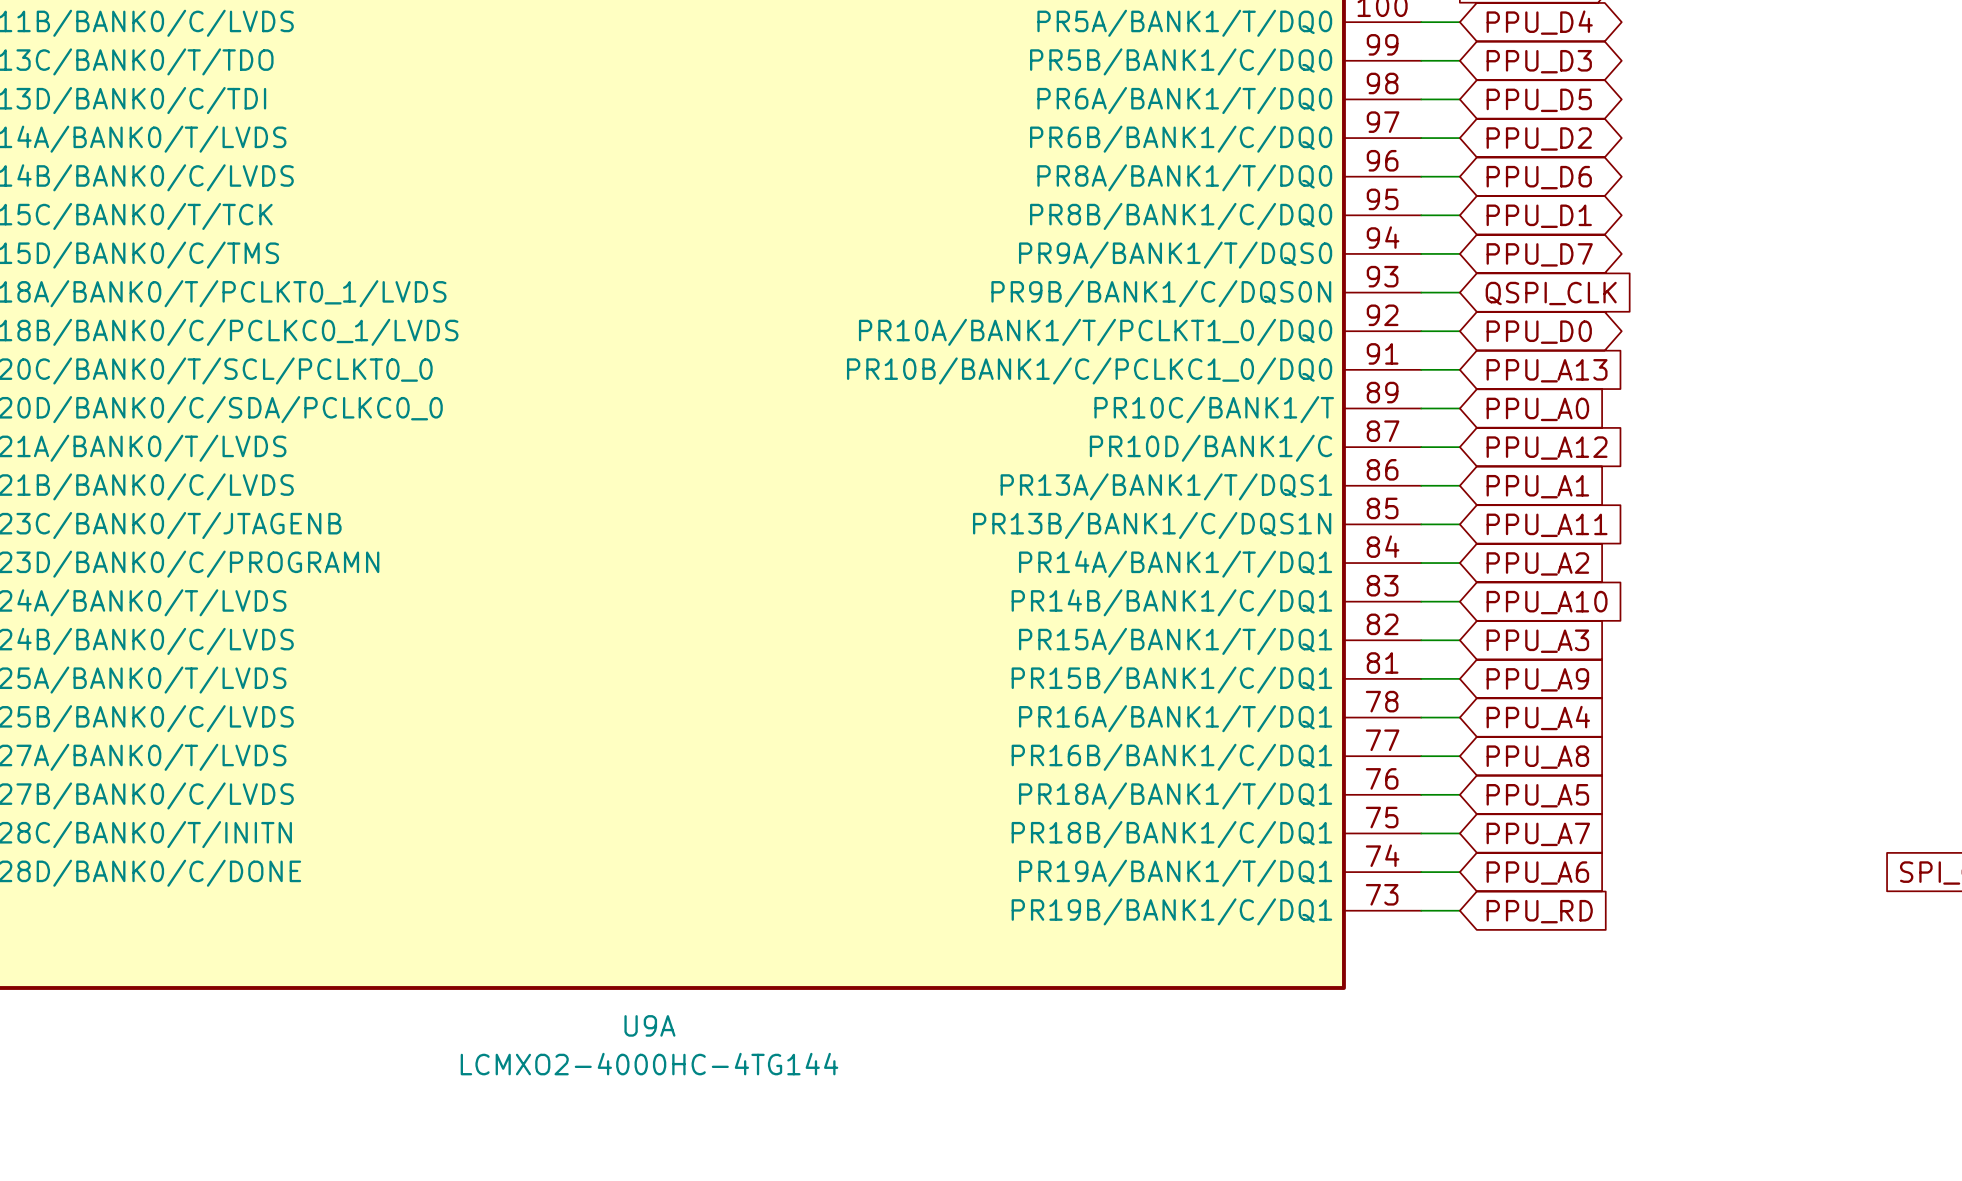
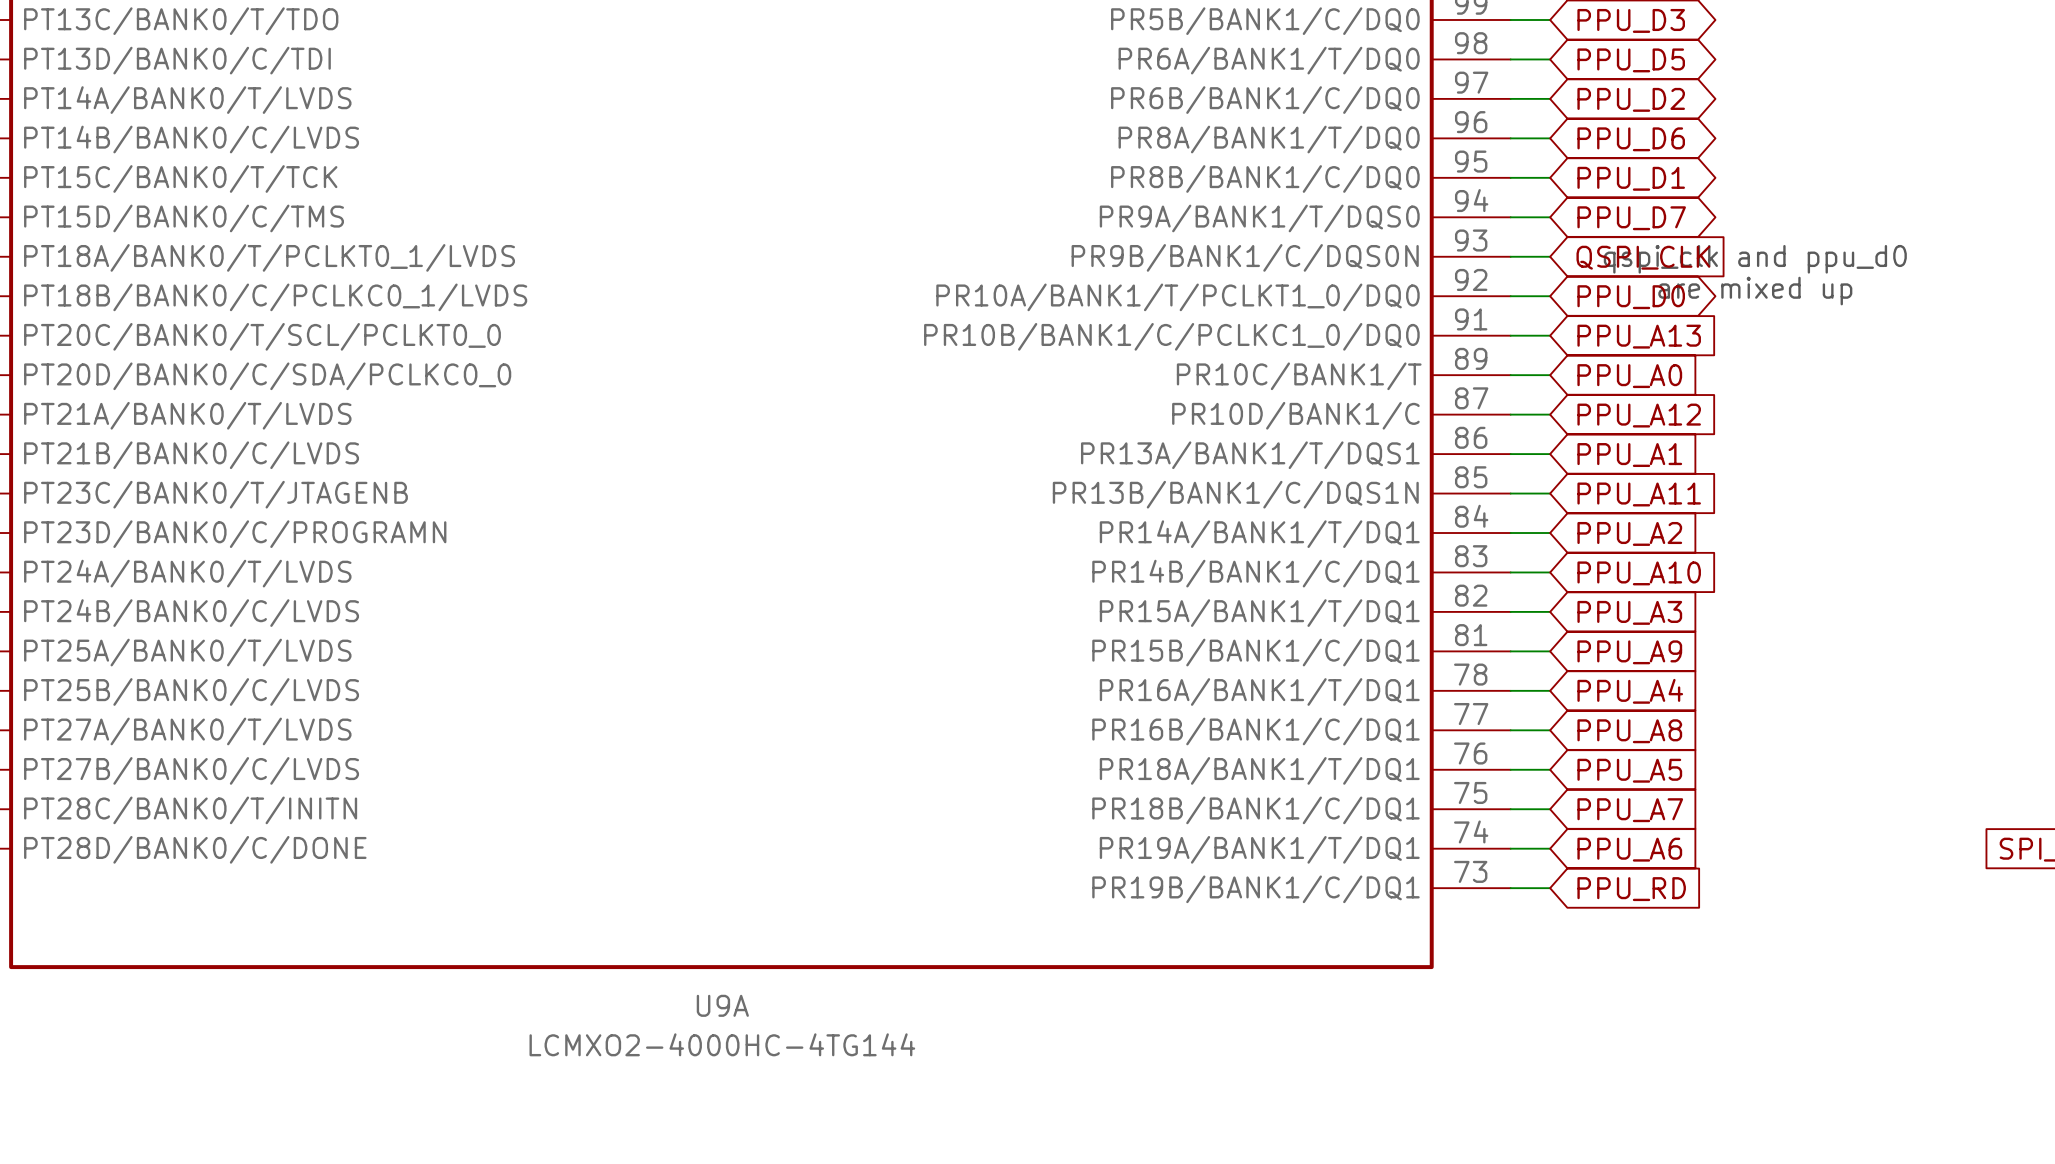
text: none -> qspi_clk and ppu_d0 (1755, 259)
text: none -> are mixed up (1755, 291)

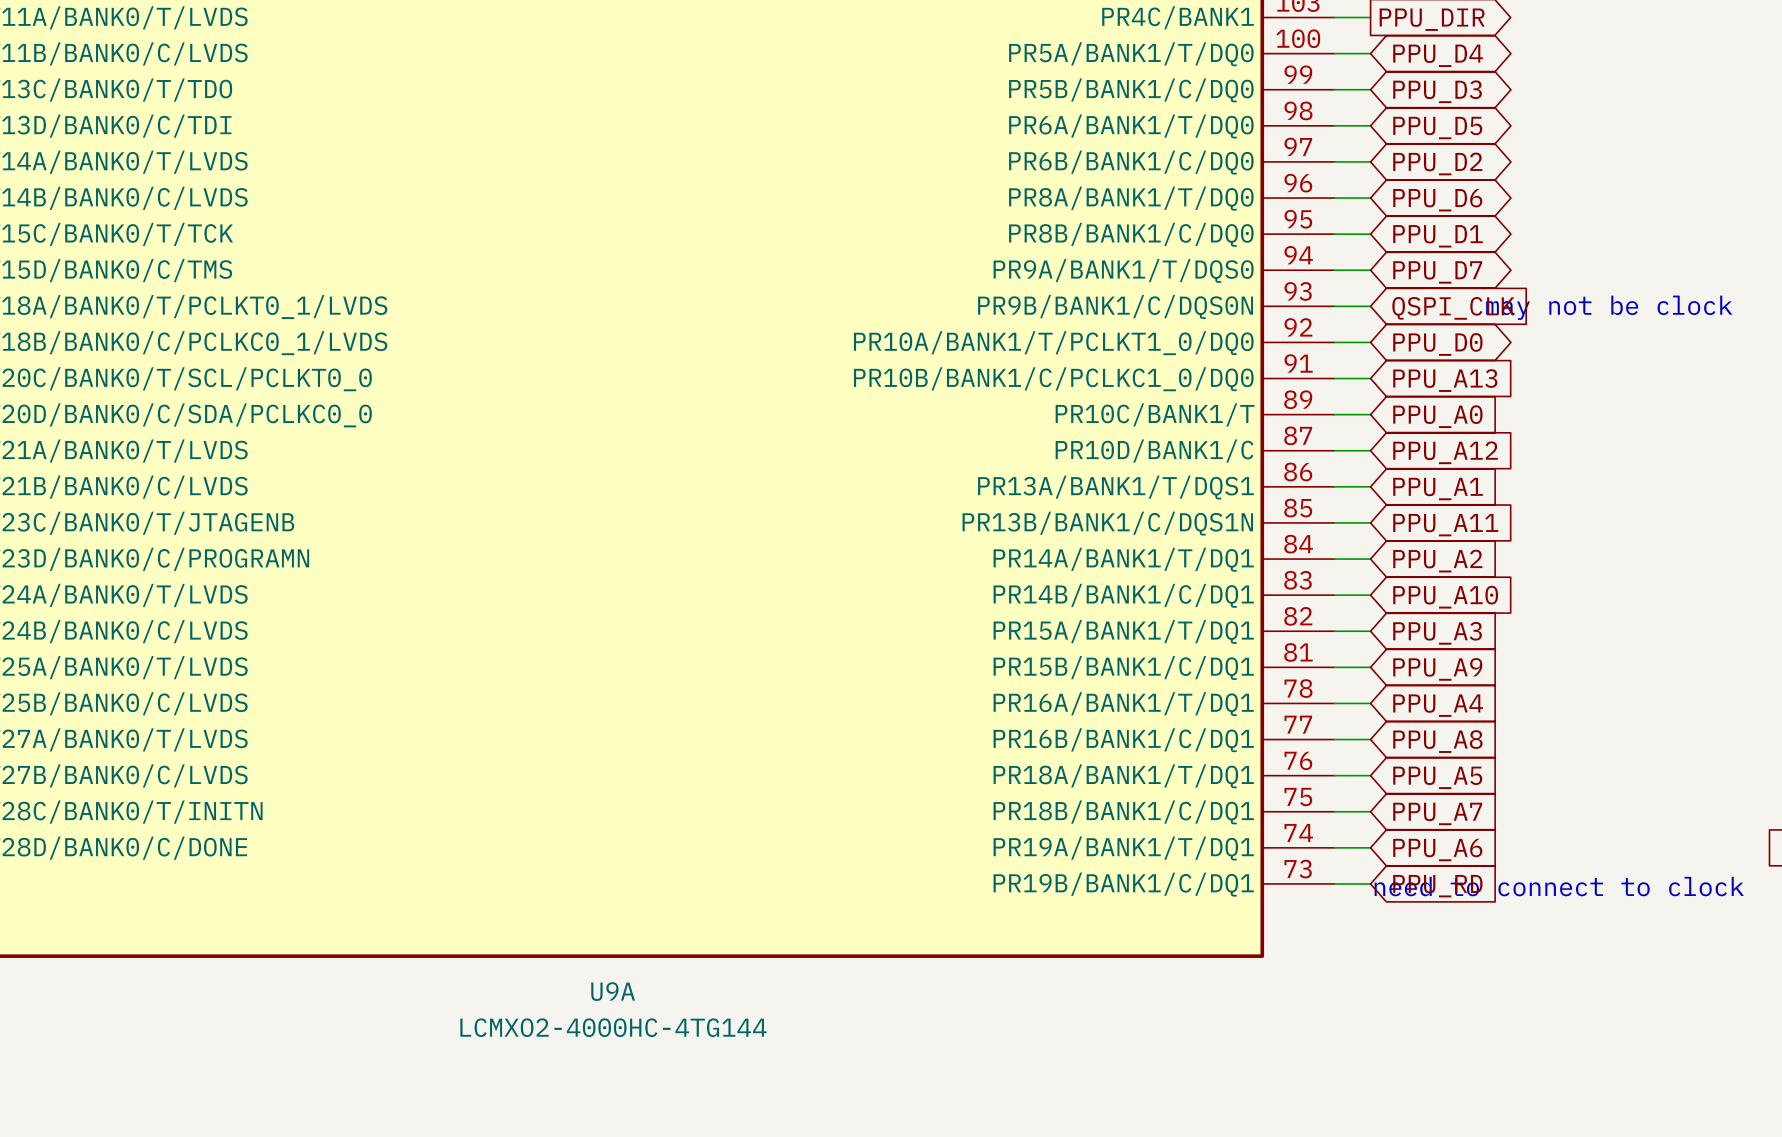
text: qspi_clk and ppu_d0 (1755, 259) -> none
text: none -> may not be clock (1609, 307)
text: are mixed up (1755, 291) -> none
text: none -> need to connect to clock (1559, 886)

